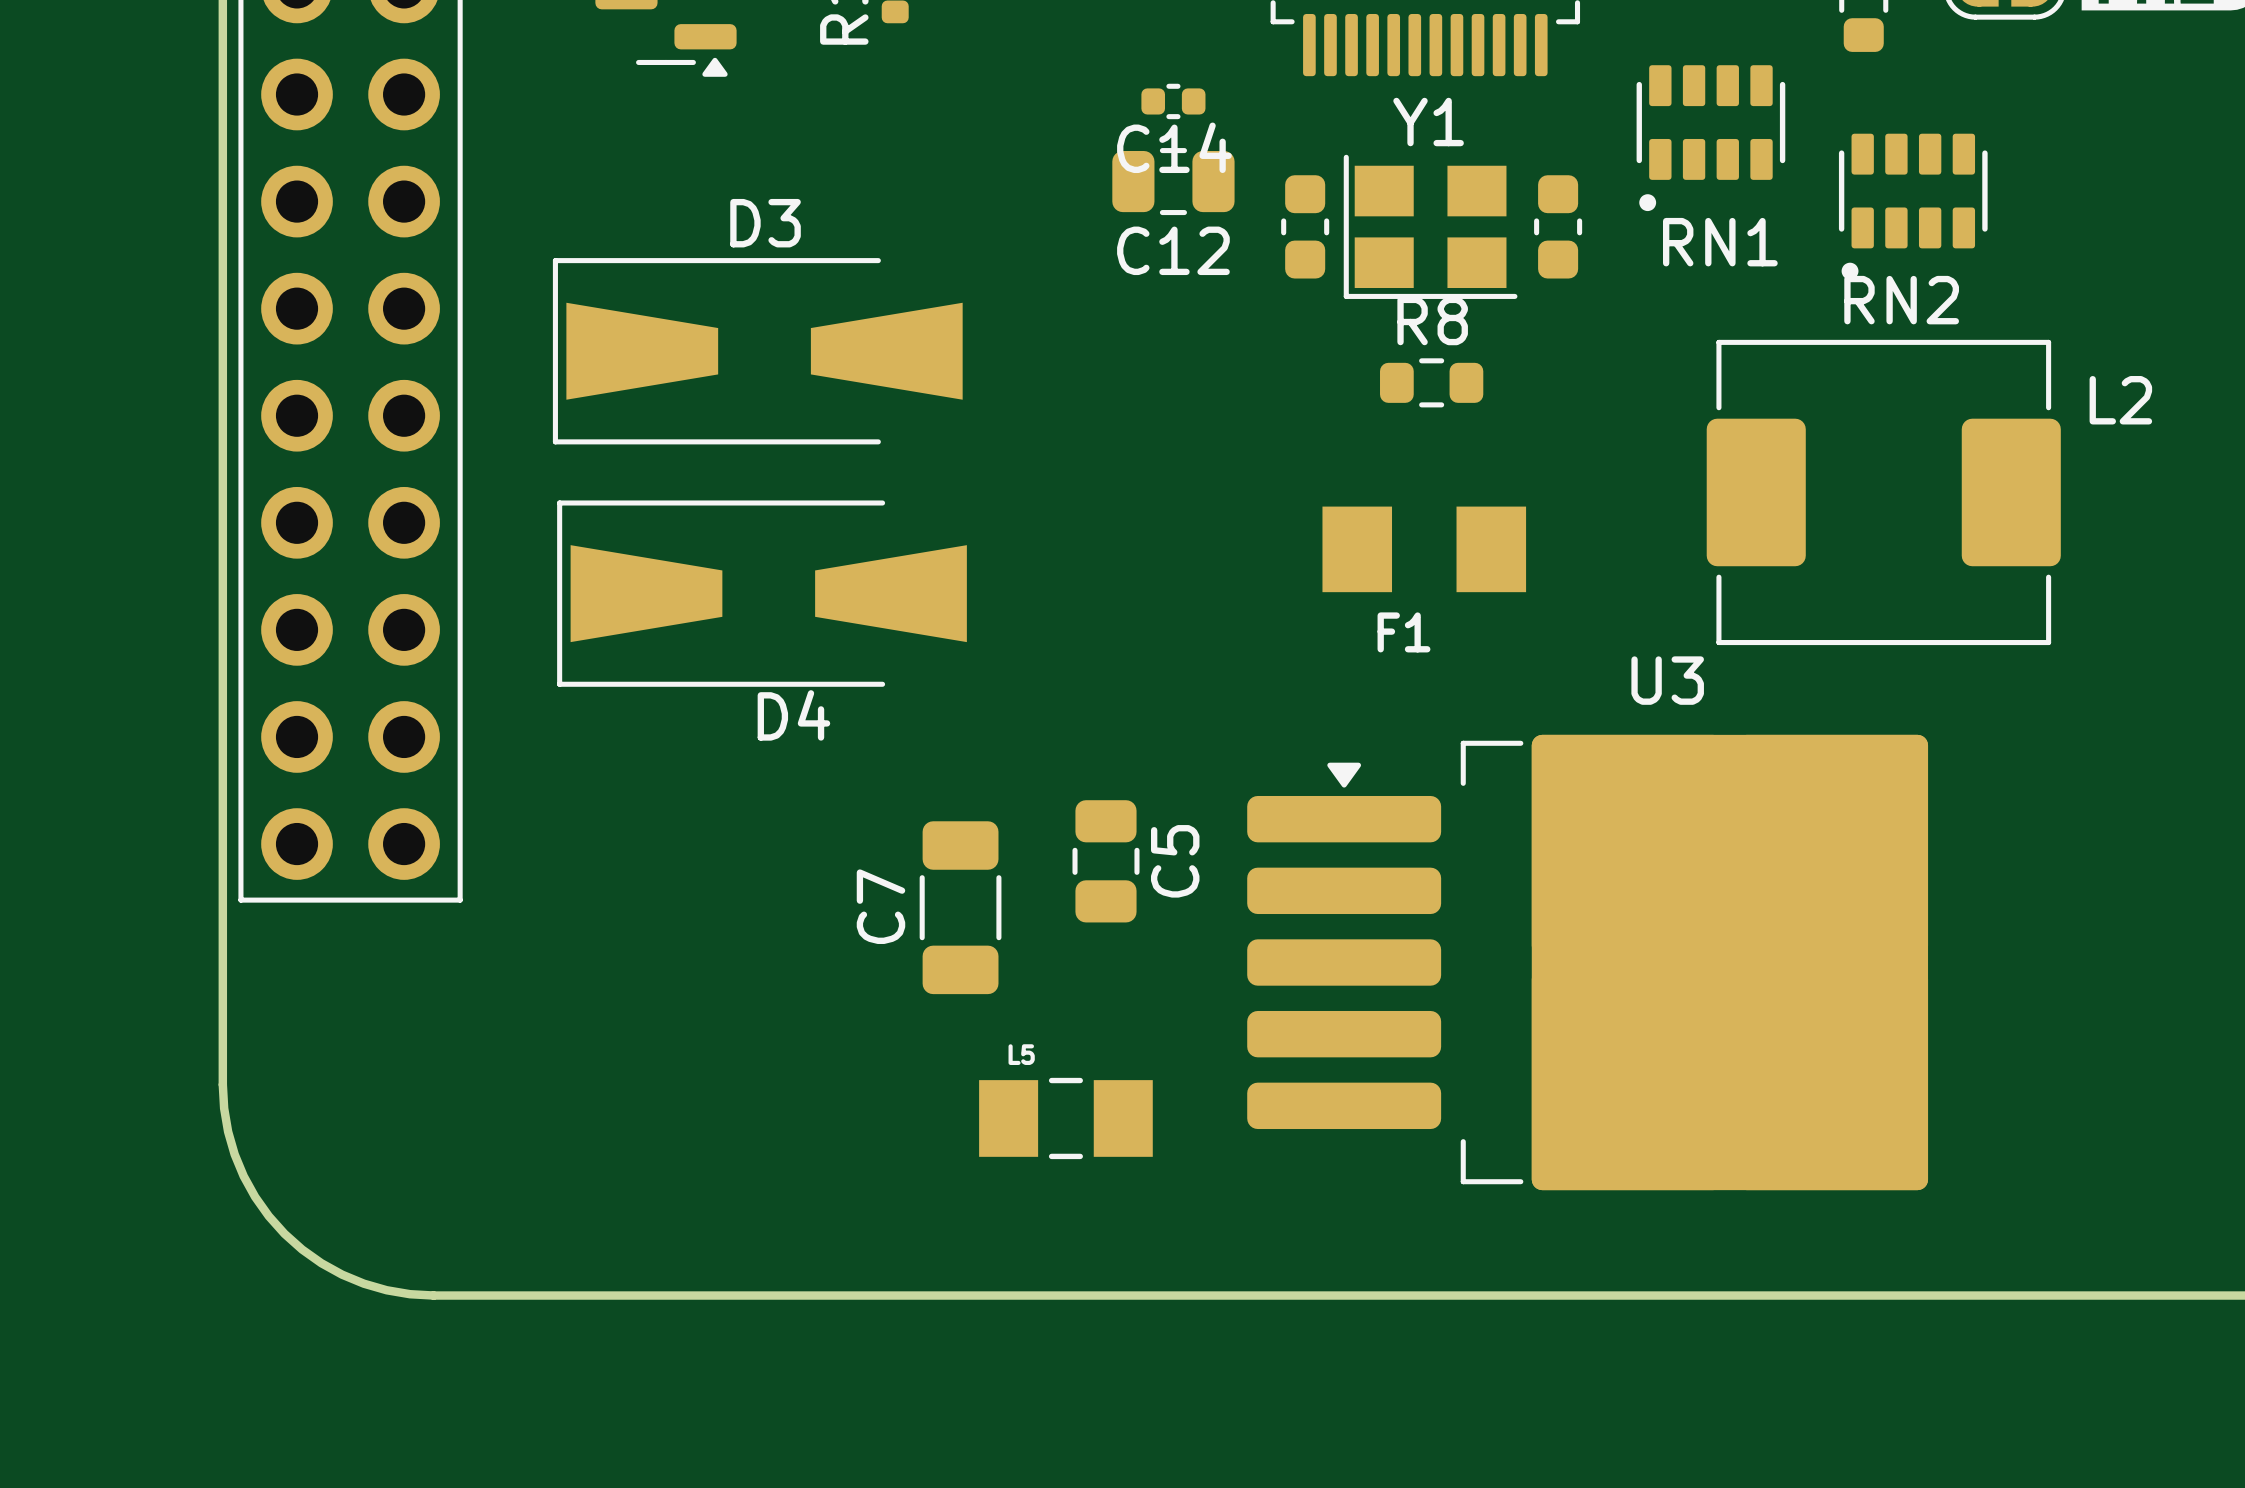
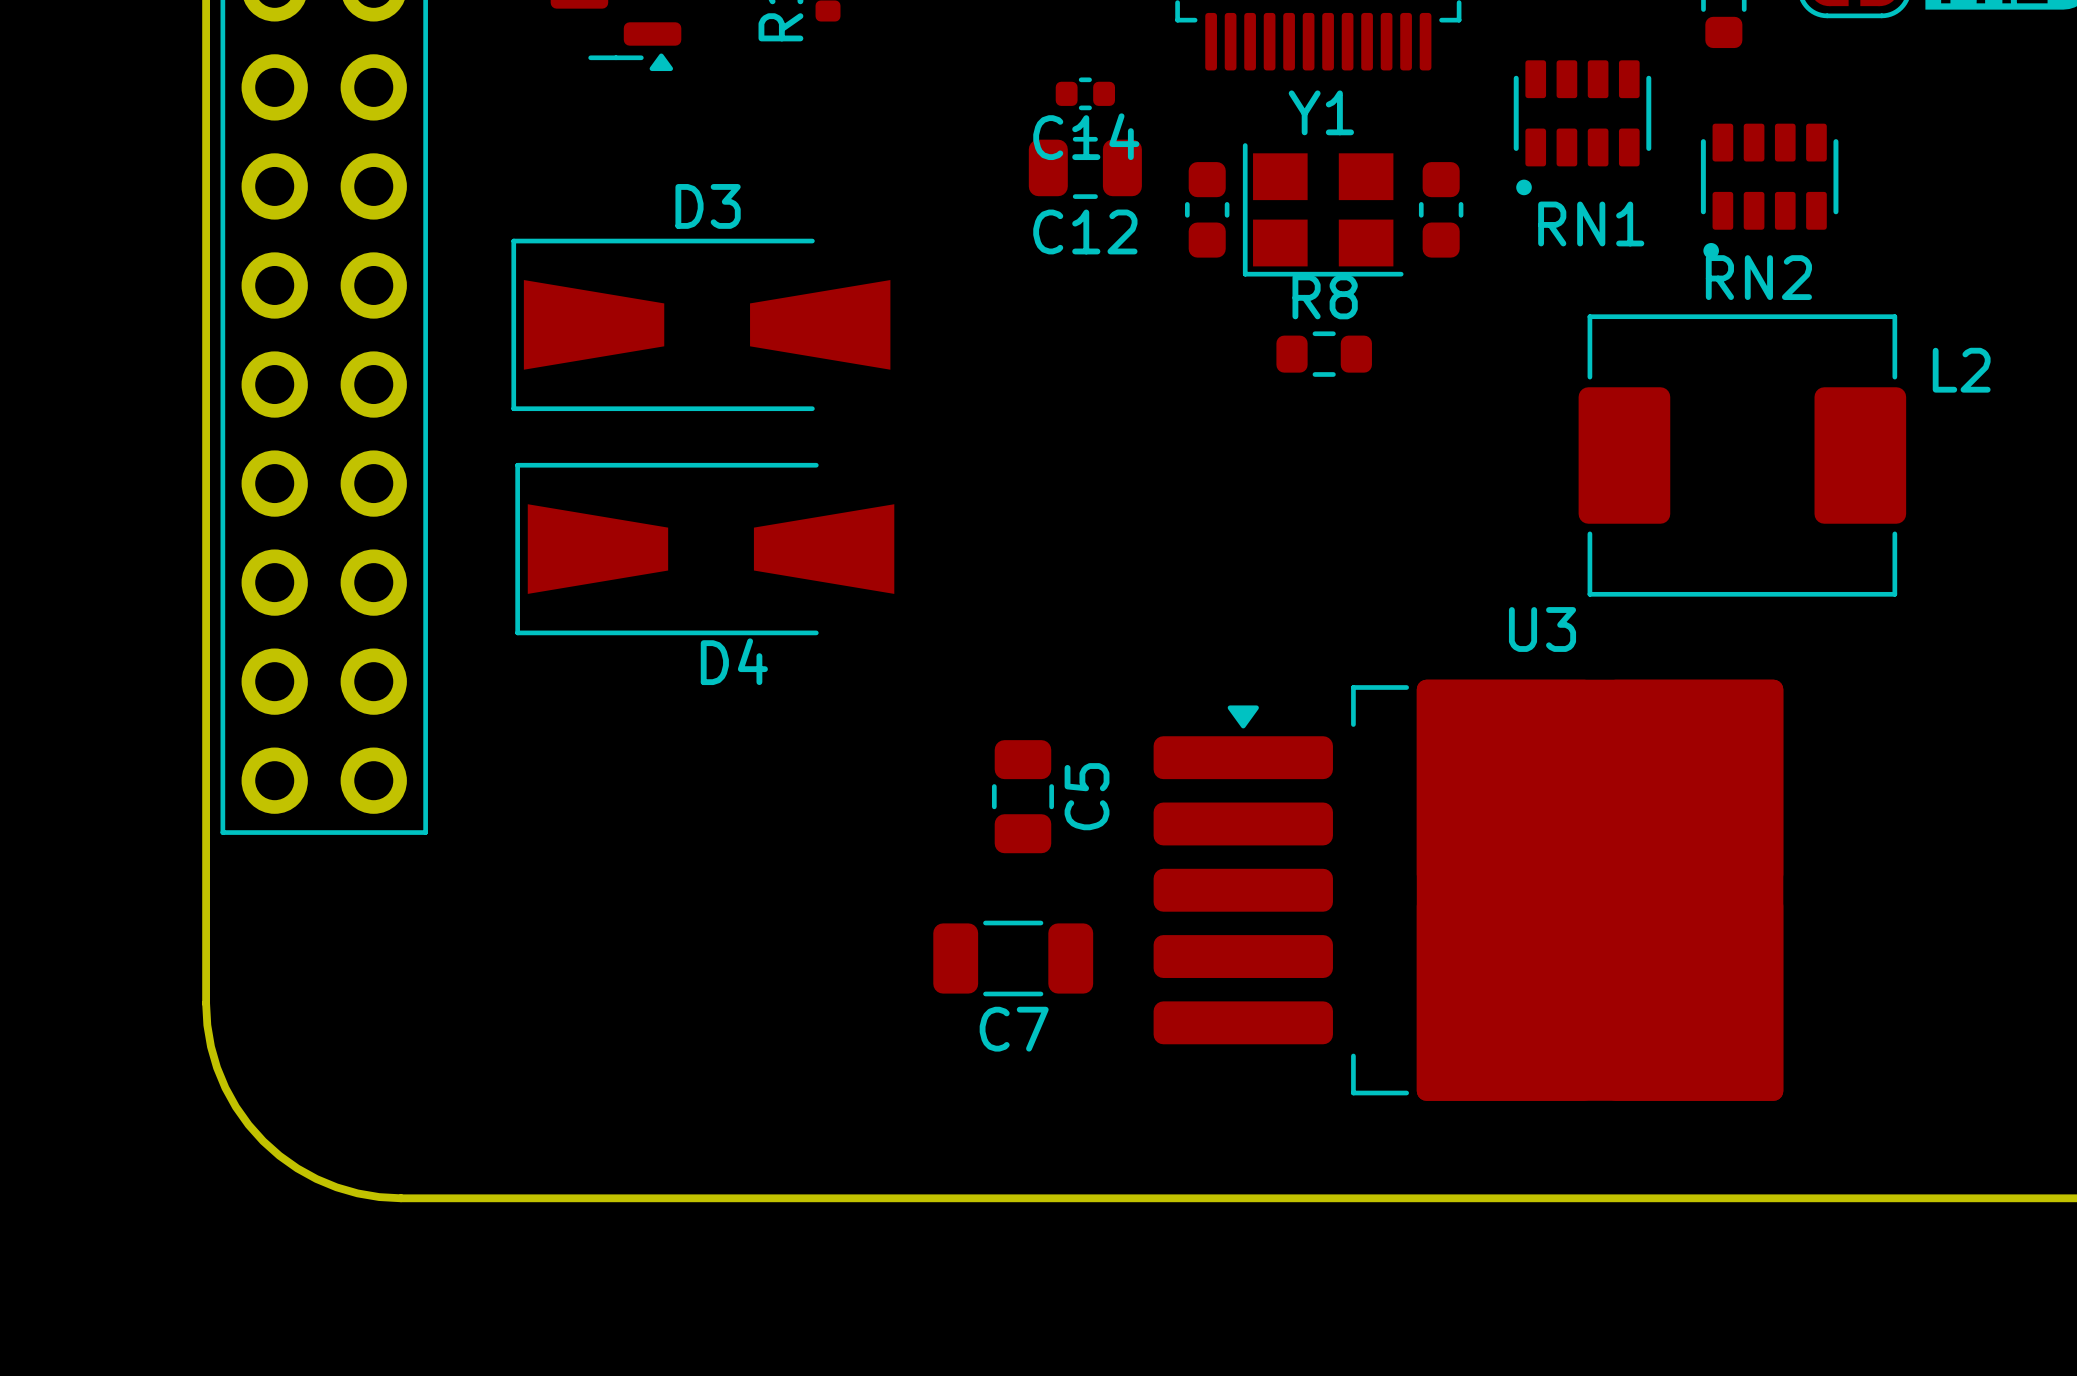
F1: (1424, 549) -> none
C7 name position: C7 (880, 906) -> C7 (1014, 1029)
C7 rotation: 0° (960, 907) -> 90° clockwise (1013, 958)
C7 position: (960, 907) -> (1013, 958)
L5: (1065, 1118) -> none

